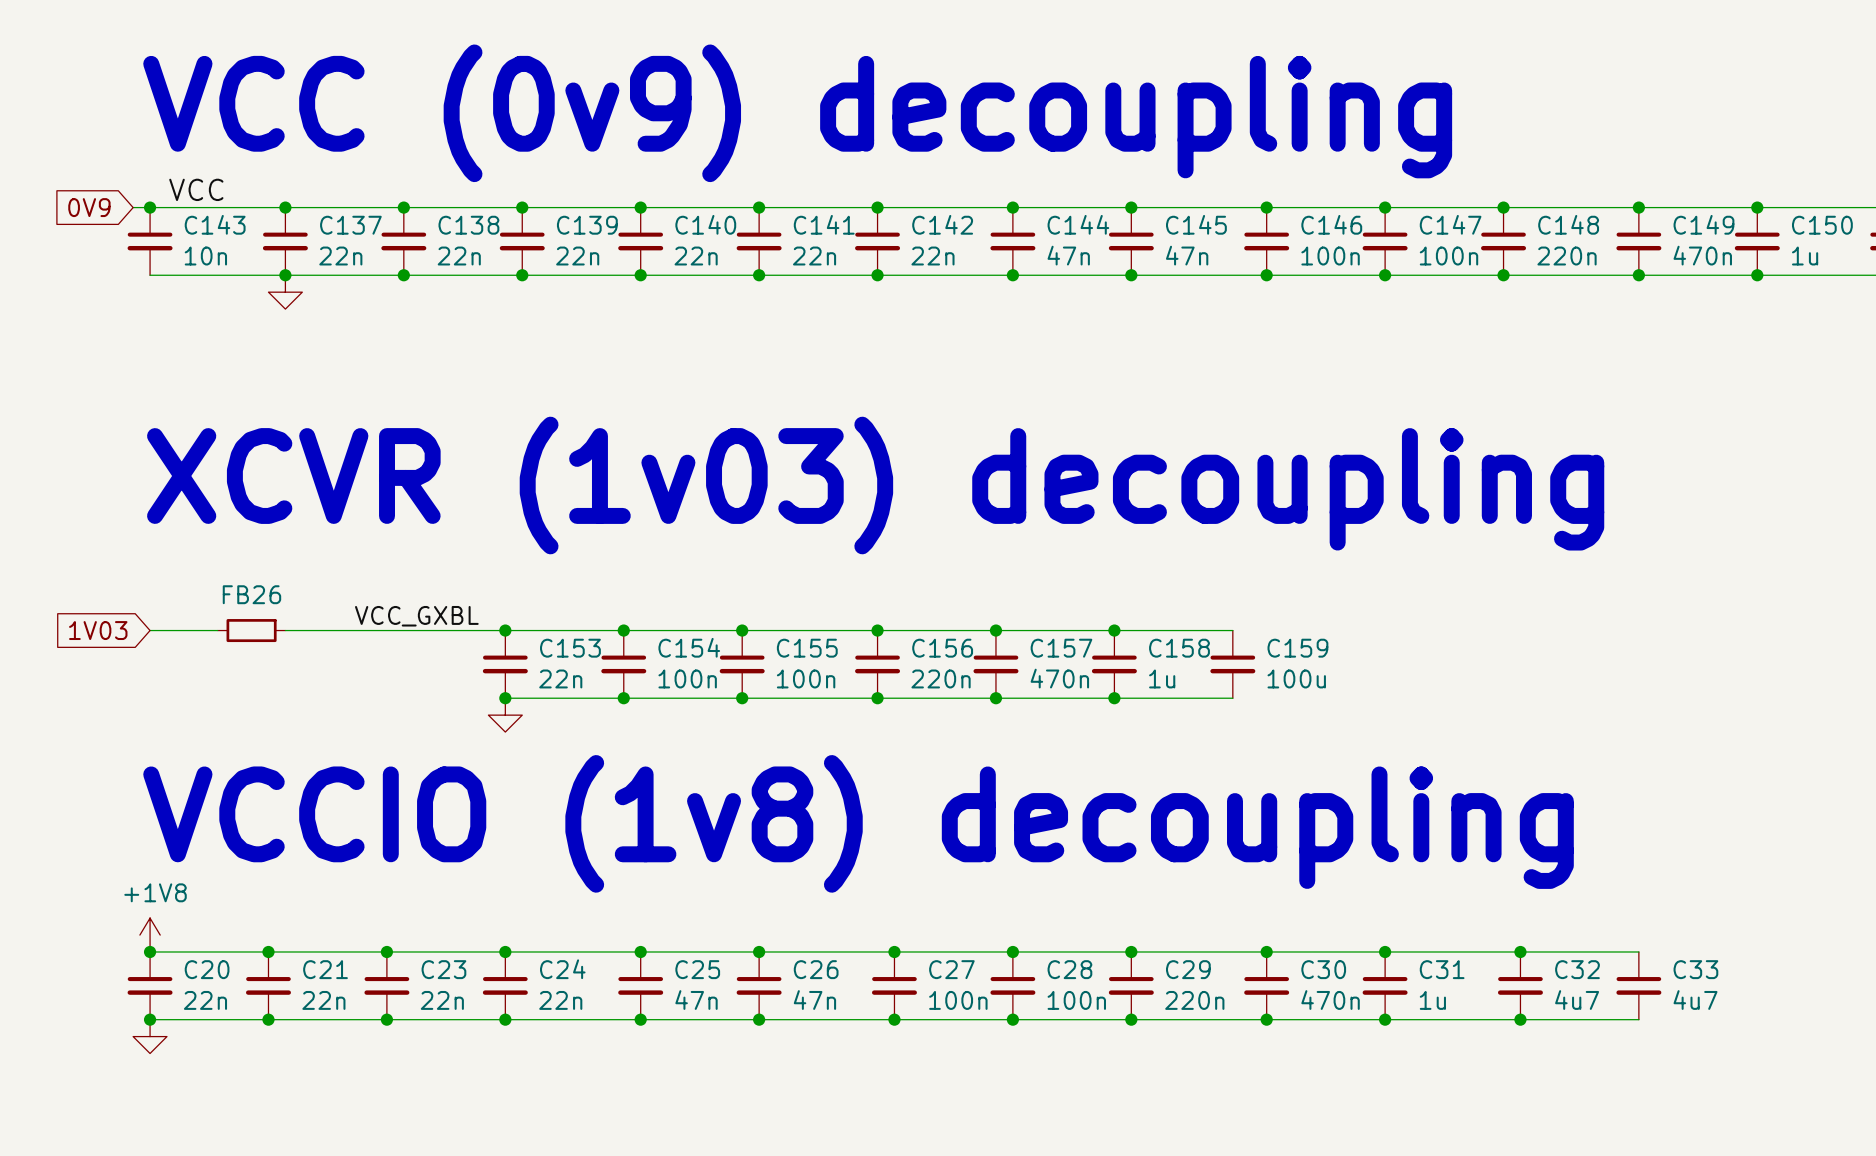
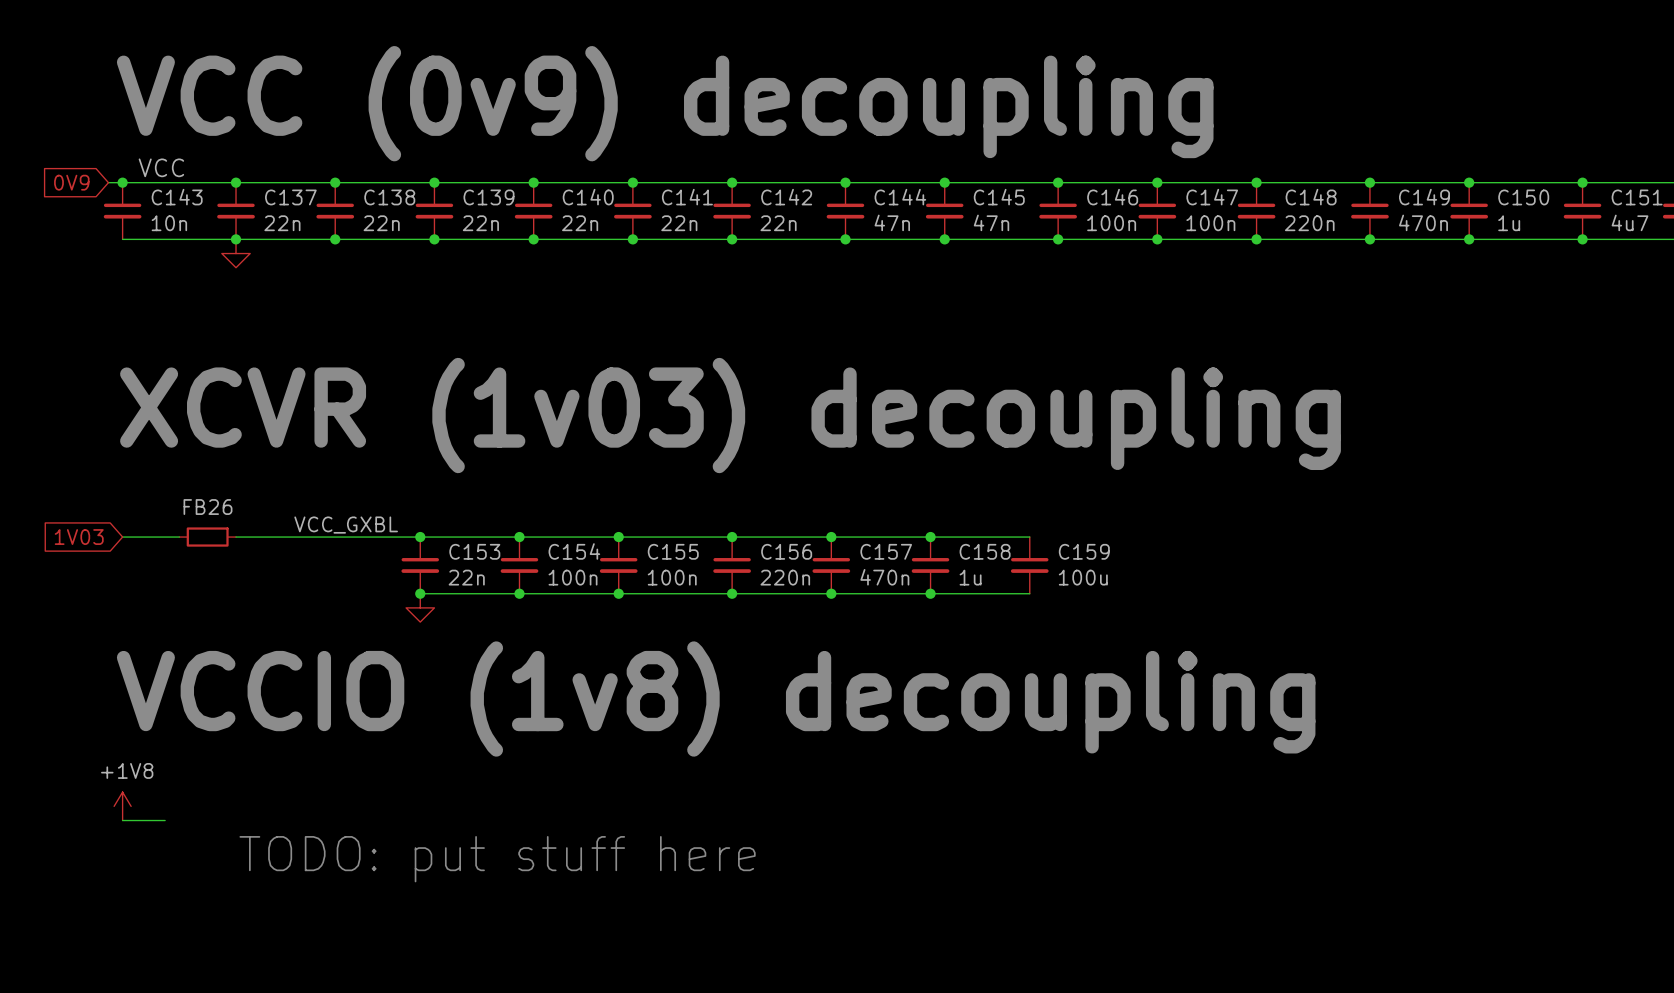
power symbol position: +1V8 (150, 935) -> +1V8 (122, 806)
wire: (150, 951) (1638, 951) -> none
junction: (150, 951) -> none
junction: (268, 951) -> none
junction: (386, 951) -> none
junction: (505, 951) -> none
junction: (640, 951) -> none
junction: (759, 951) -> none
junction: (894, 951) -> none
junction: (1012, 951) -> none
junction: (1131, 951) -> none
junction: (1266, 951) -> none
junction: (1385, 951) -> none
junction: (1520, 951) -> none
wire: none -> (122, 820) (165, 820)
C20: 22n (150, 985) -> none
C21: 22n (268, 985) -> none
C23: 22n (386, 985) -> none
C24: 22n (505, 985) -> none
C25: 47n (640, 985) -> none
C26: 47n (759, 985) -> none
C27: 100n (894, 985) -> none
C28: 100n (1012, 985) -> none
C29: 220n (1131, 985) -> none
C30: 470n (1266, 985) -> none
C31: 1u (1385, 985) -> none
C32: 4u7 (1520, 985) -> none
C33: 4u7 (1638, 985) -> none
text: none -> TODO: put stuff here (497, 859)
wire: (150, 1019) (1638, 1019) -> none
junction: (150, 1019) -> none
junction: (268, 1019) -> none
junction: (386, 1019) -> none
junction: (505, 1019) -> none
junction: (640, 1019) -> none
junction: (759, 1019) -> none
junction: (894, 1019) -> none
junction: (1012, 1019) -> none
junction: (1131, 1019) -> none
junction: (1266, 1019) -> none
junction: (1385, 1019) -> none
junction: (1520, 1019) -> none
power symbol: (150, 1036) -> none

